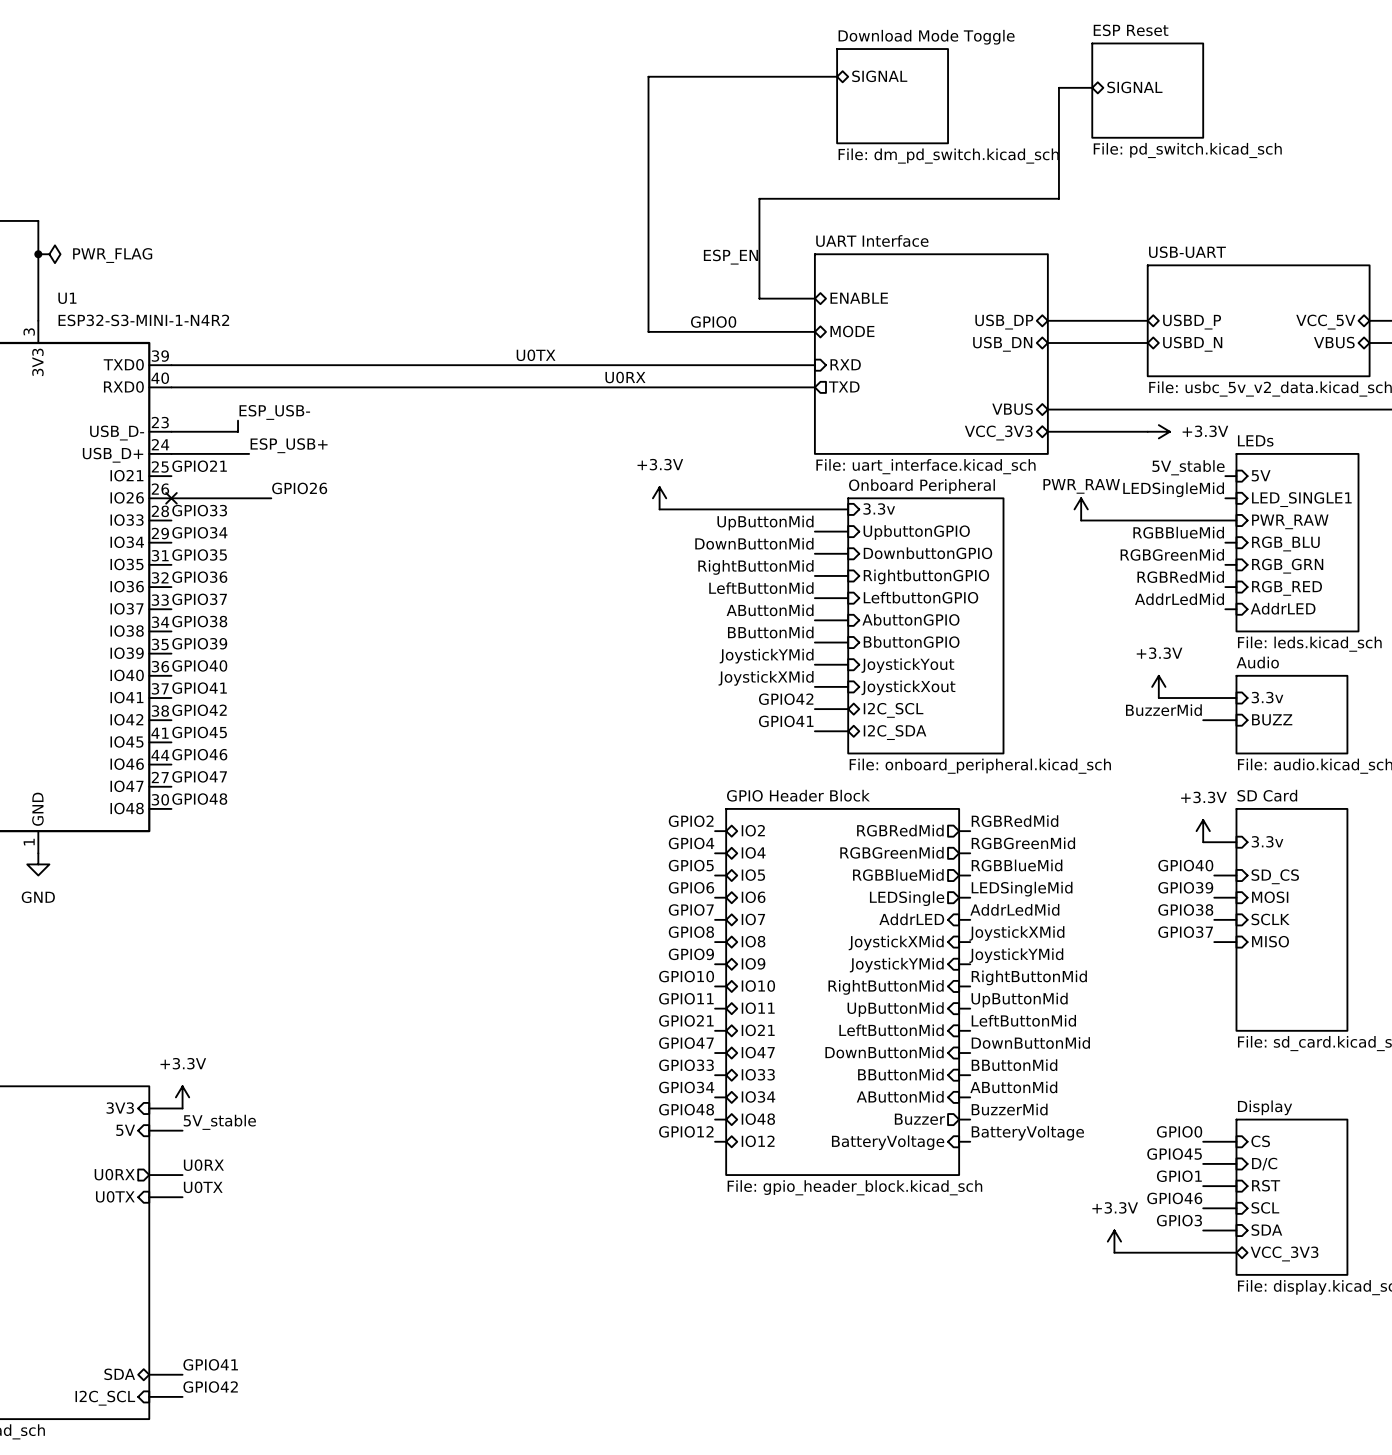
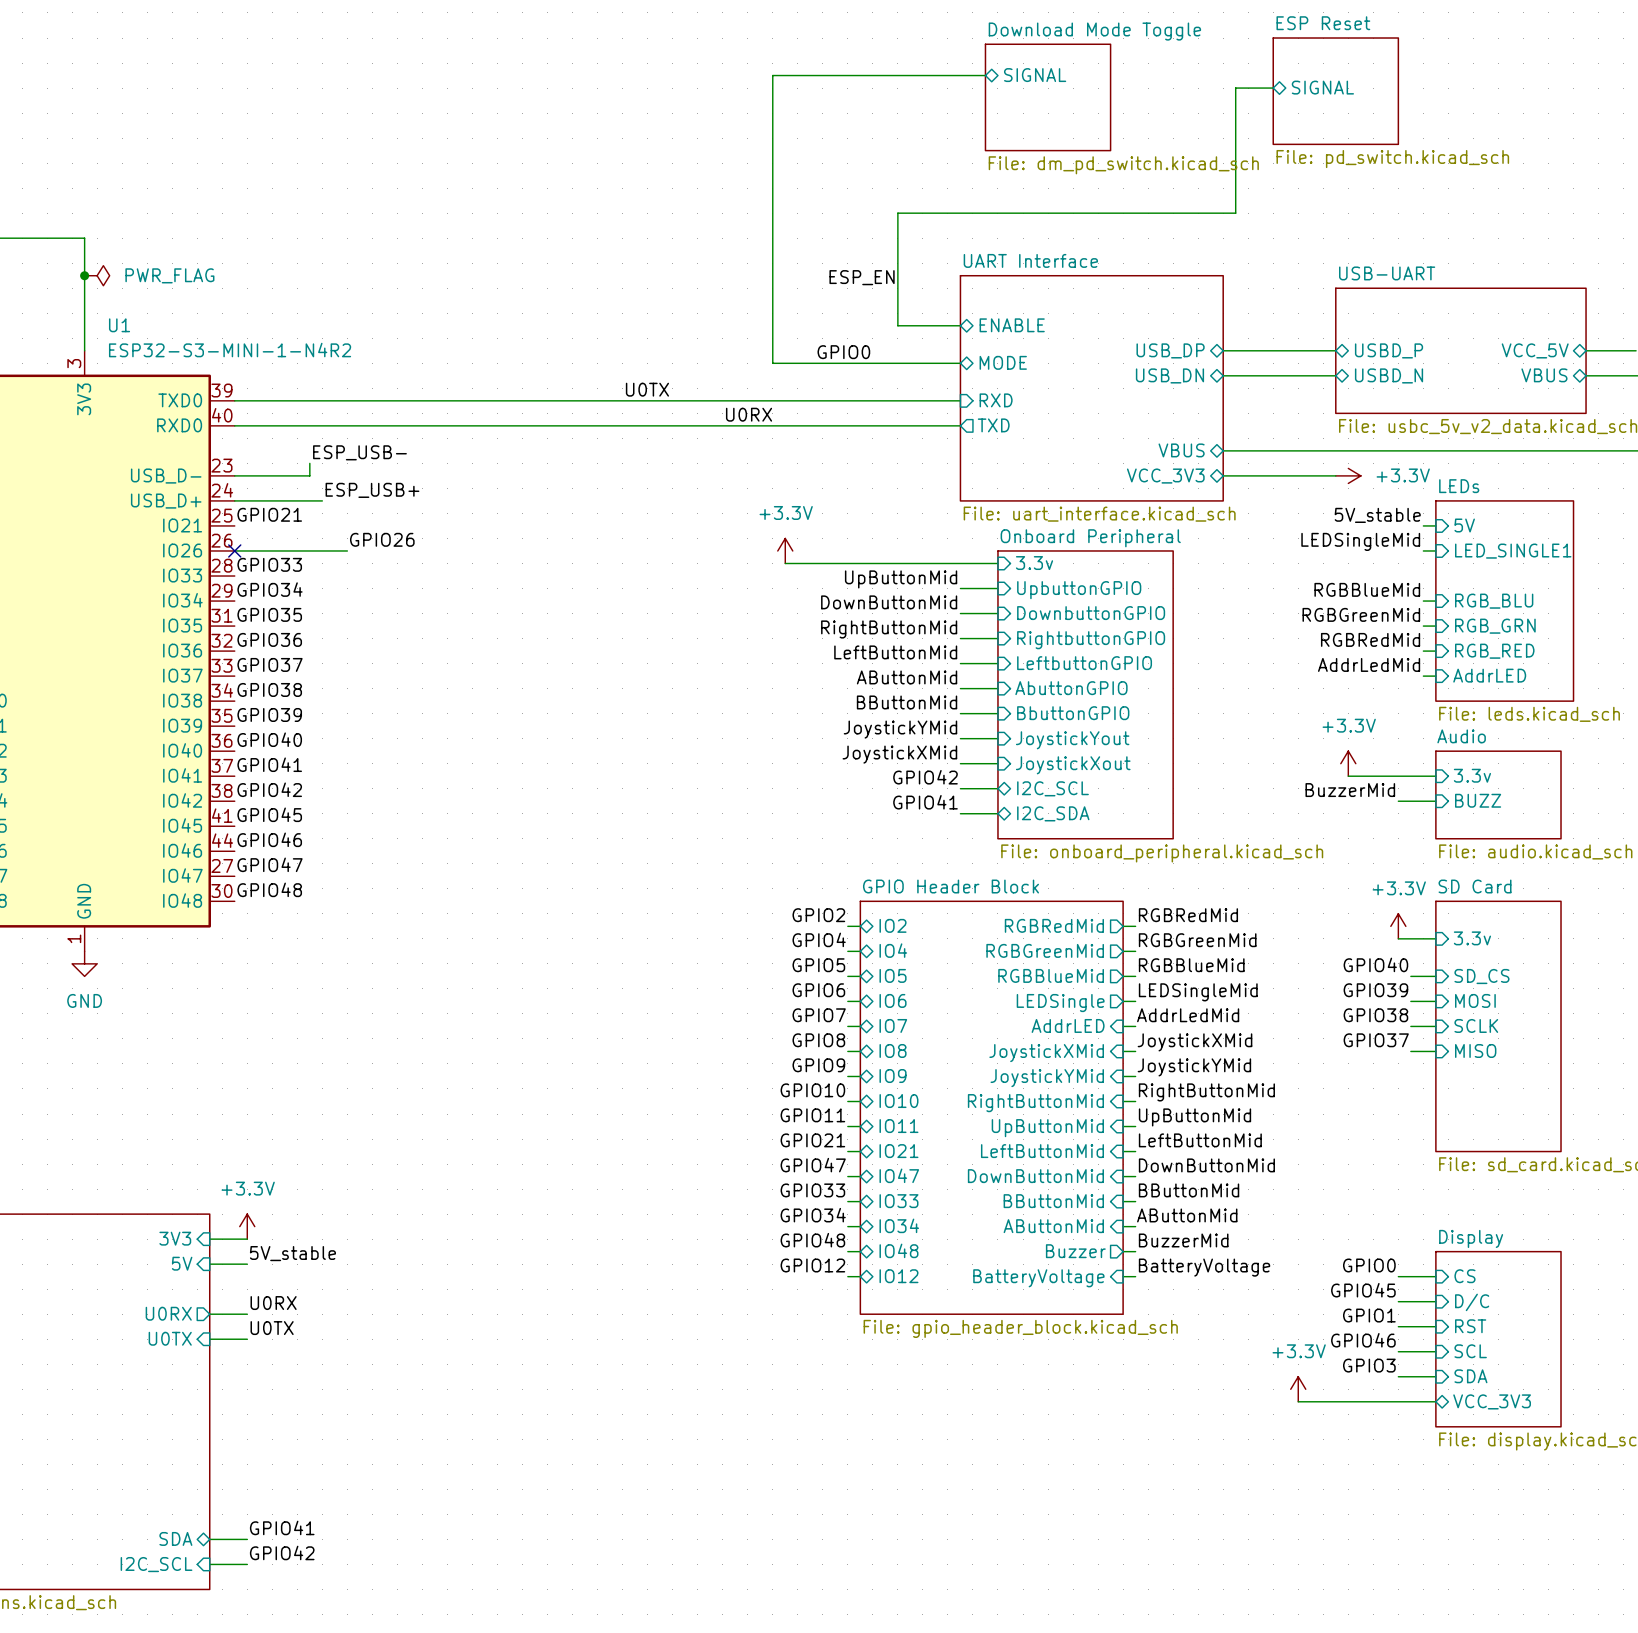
power symbol: PWR_RAW (1081, 509) -> none
wire: (1081, 520) (1236, 520) -> none
sheet pin: PWR_RAW (1290, 521) -> none

